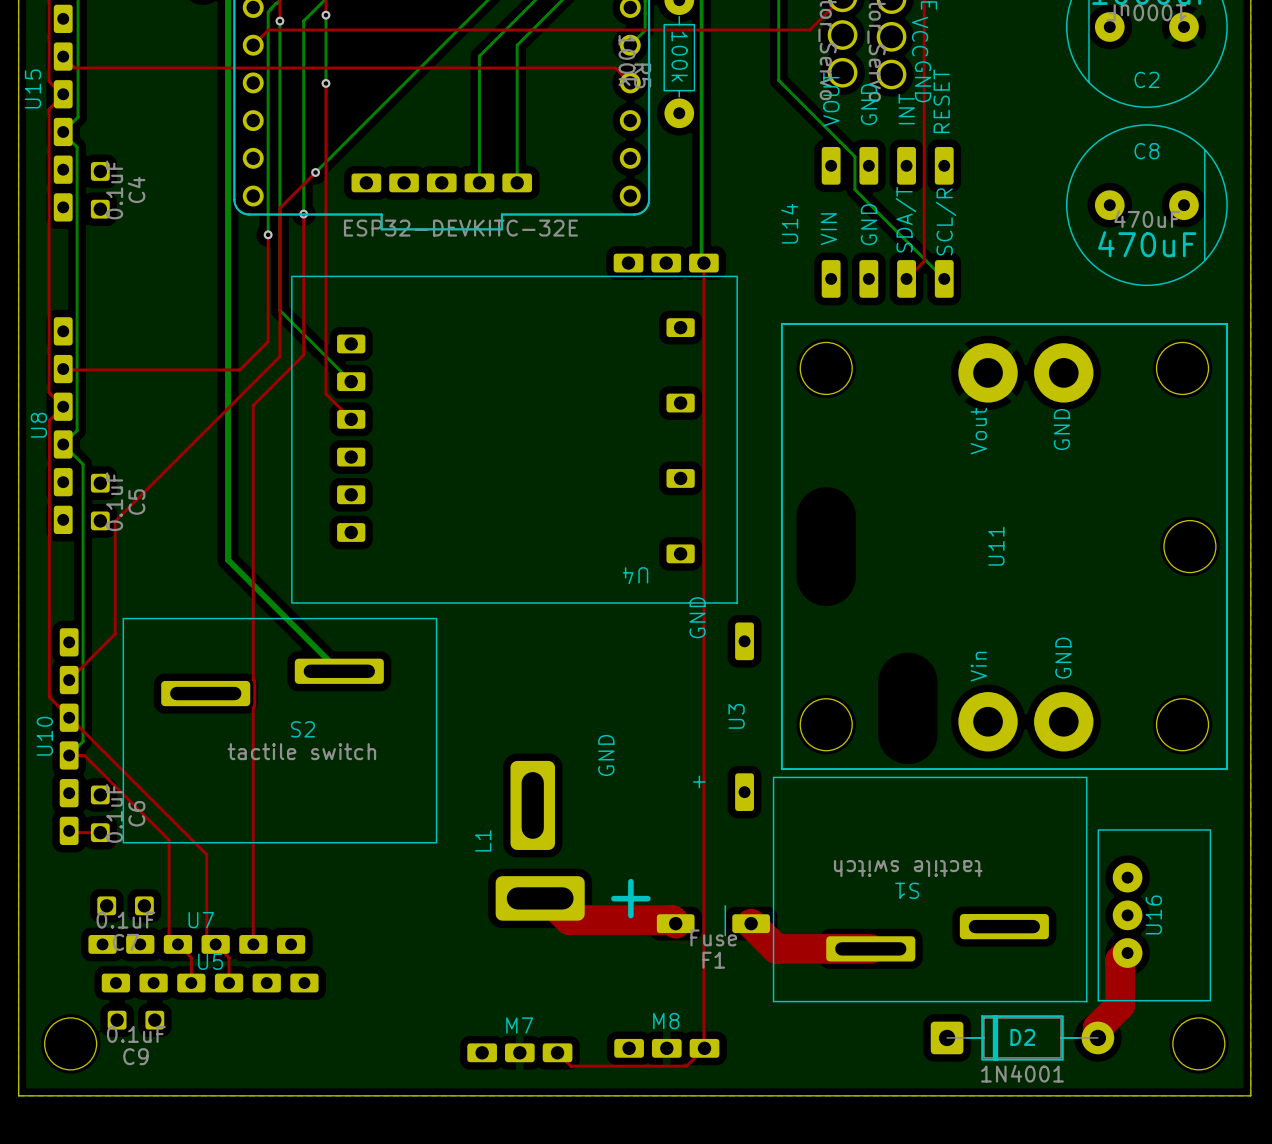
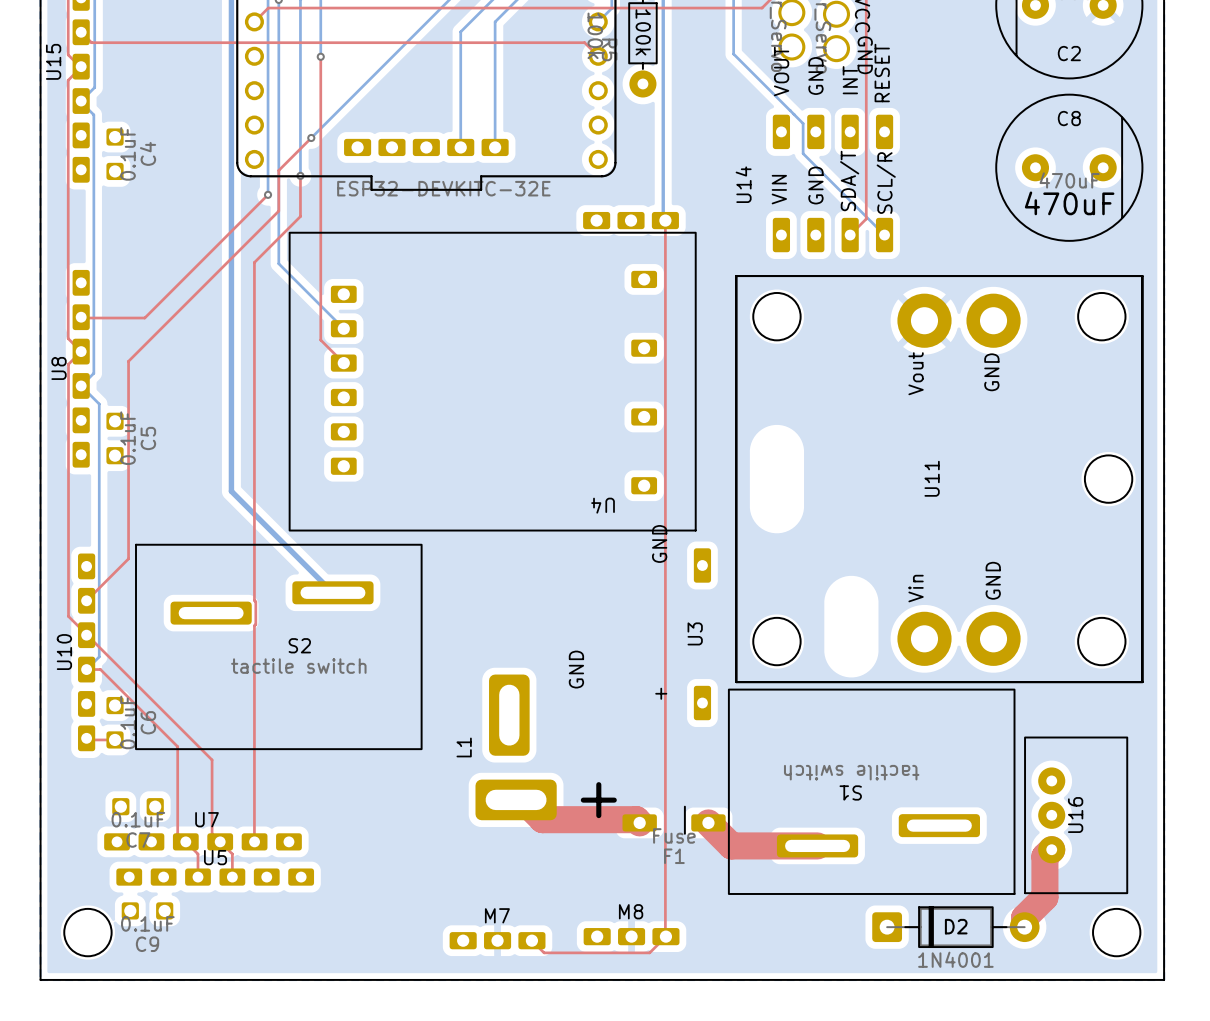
top track: (268, 234) (268, 341) (239, 369) (132, 369) -> (267, 194) (144, 318)
top track: (279, 252) (279, 356) (115, 521) -> (278, 211) (128, 361) (128, 456)
top track: (303, 258) (303, 355) (253, 405) -> (300, 216) (254, 262) (254, 350)

